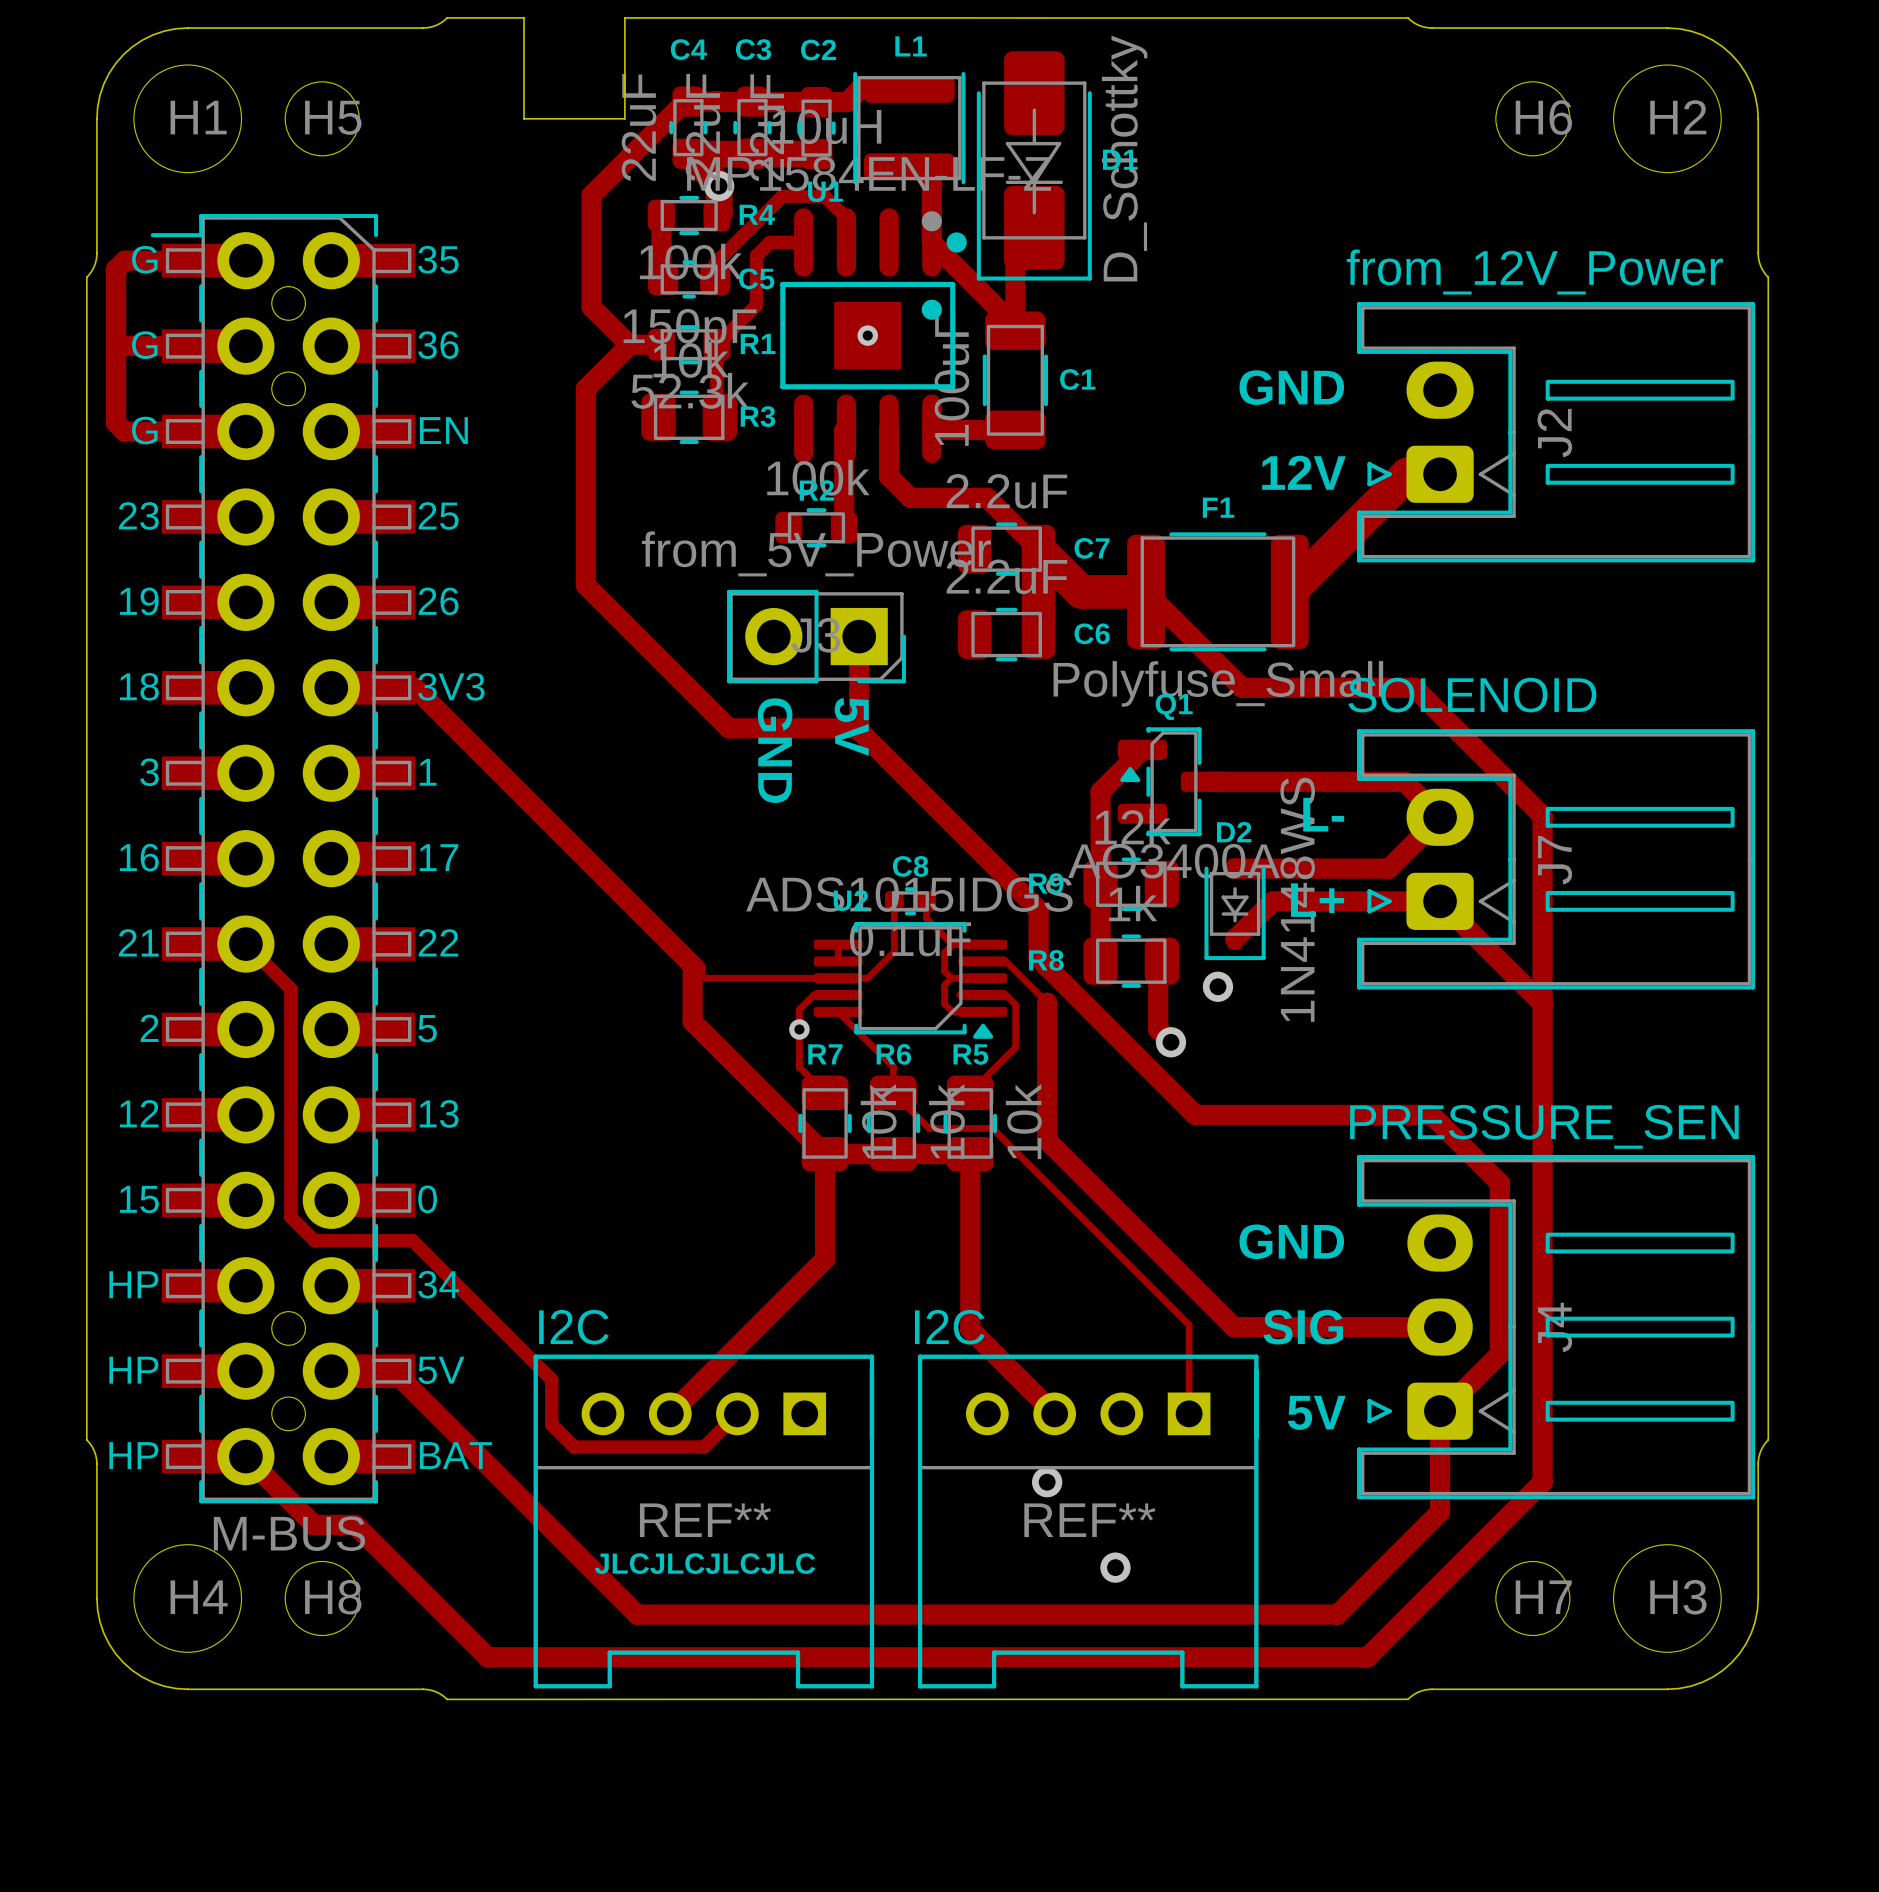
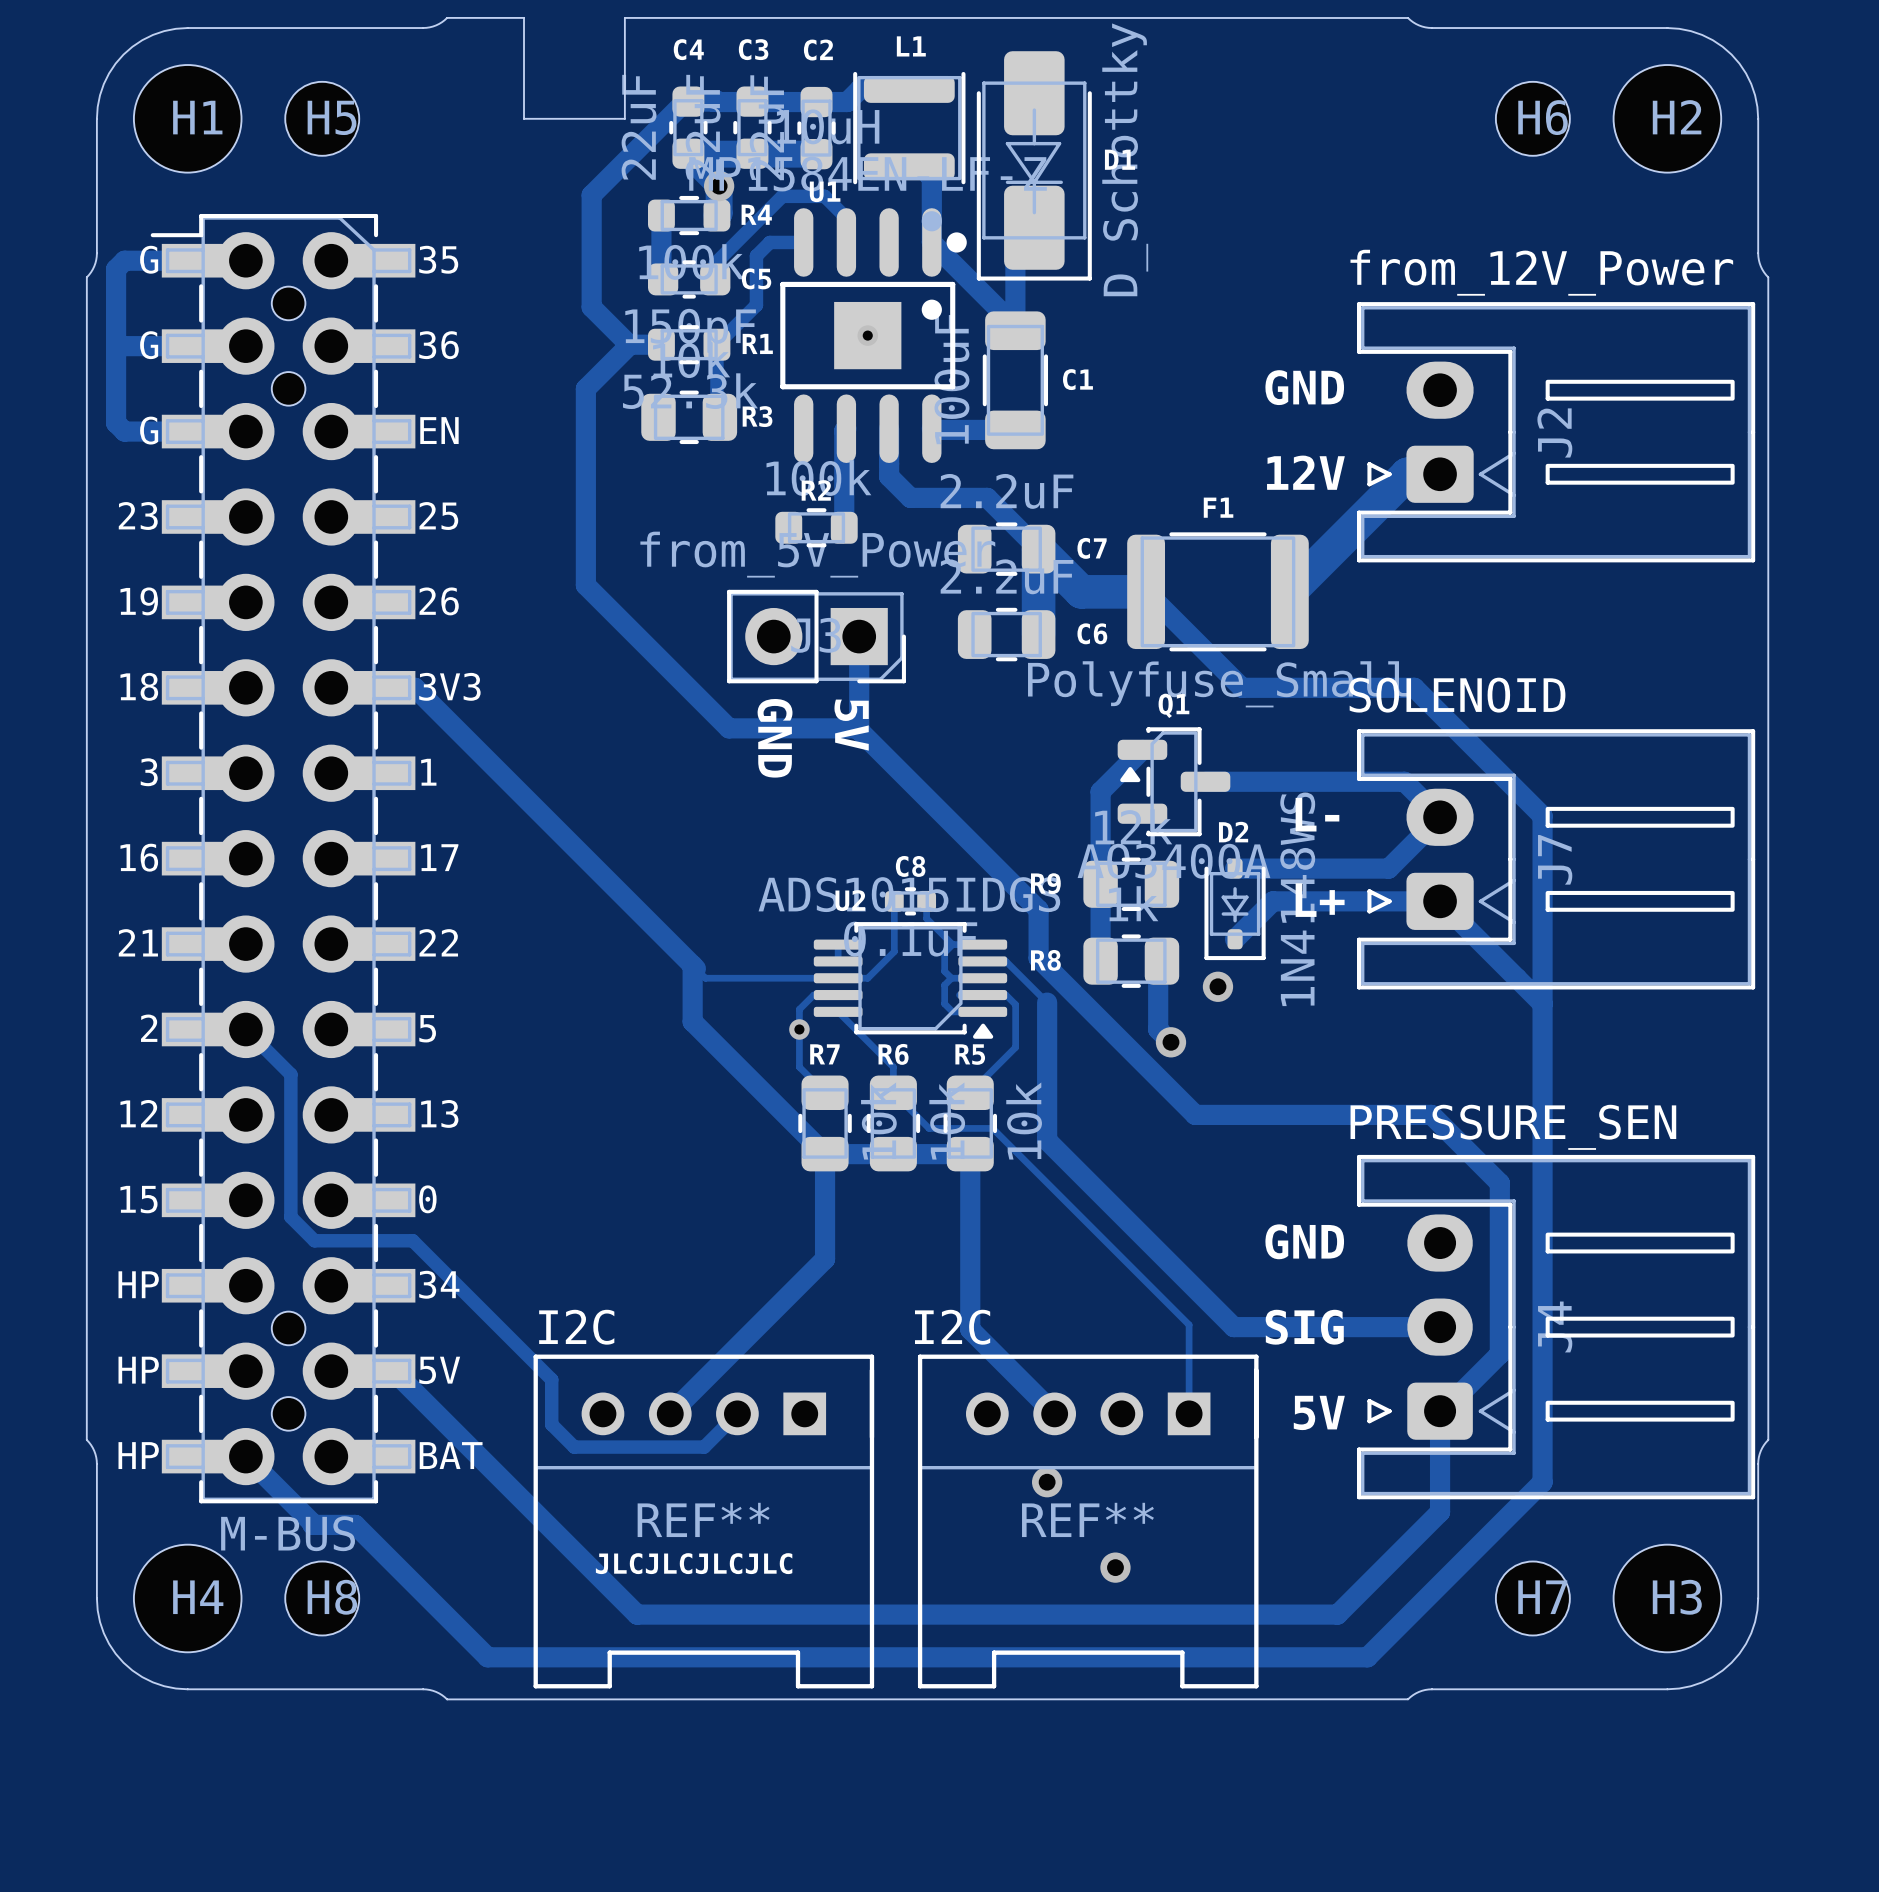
track: (245, 944) (290, 989) (290, 1074) -> (245, 1029) (290, 1074)

